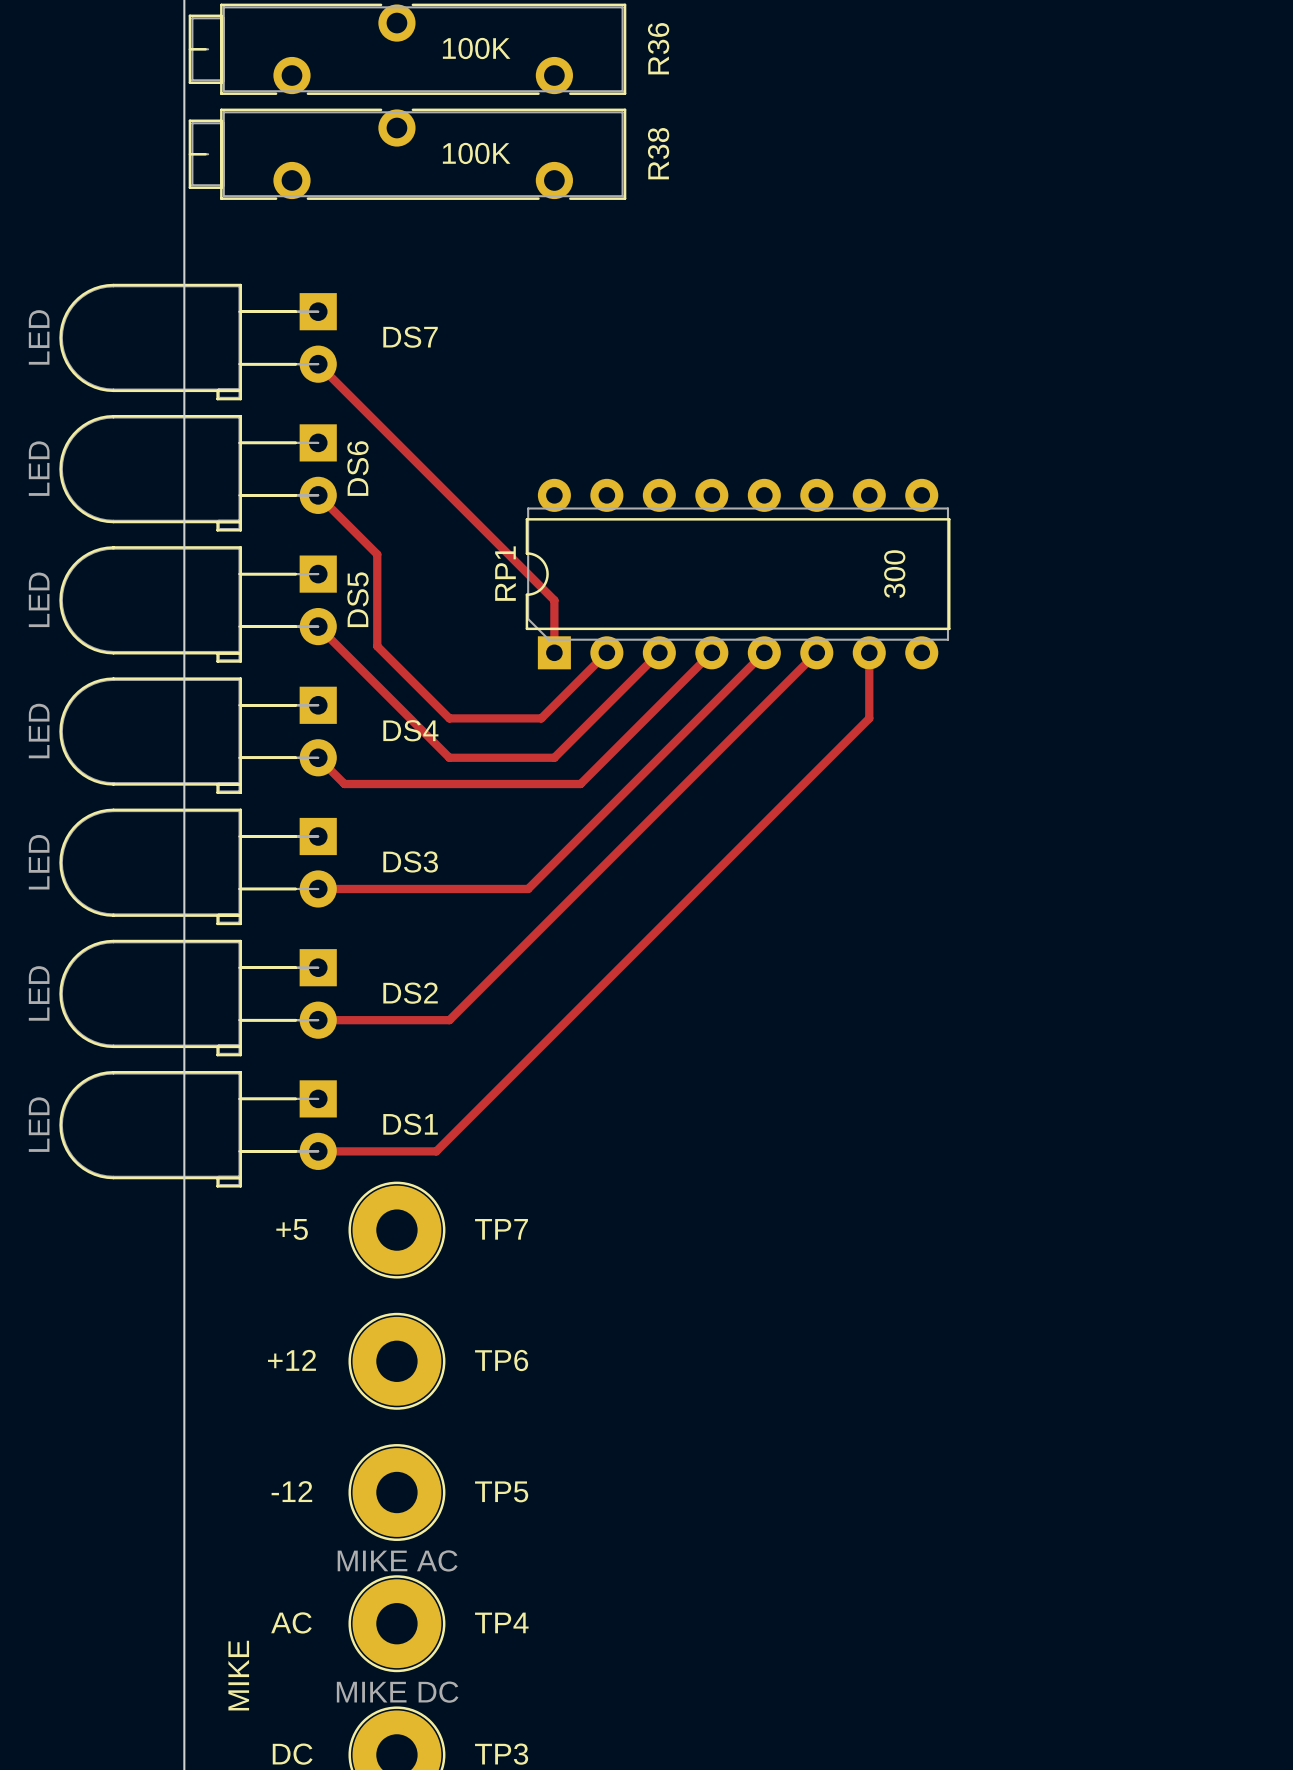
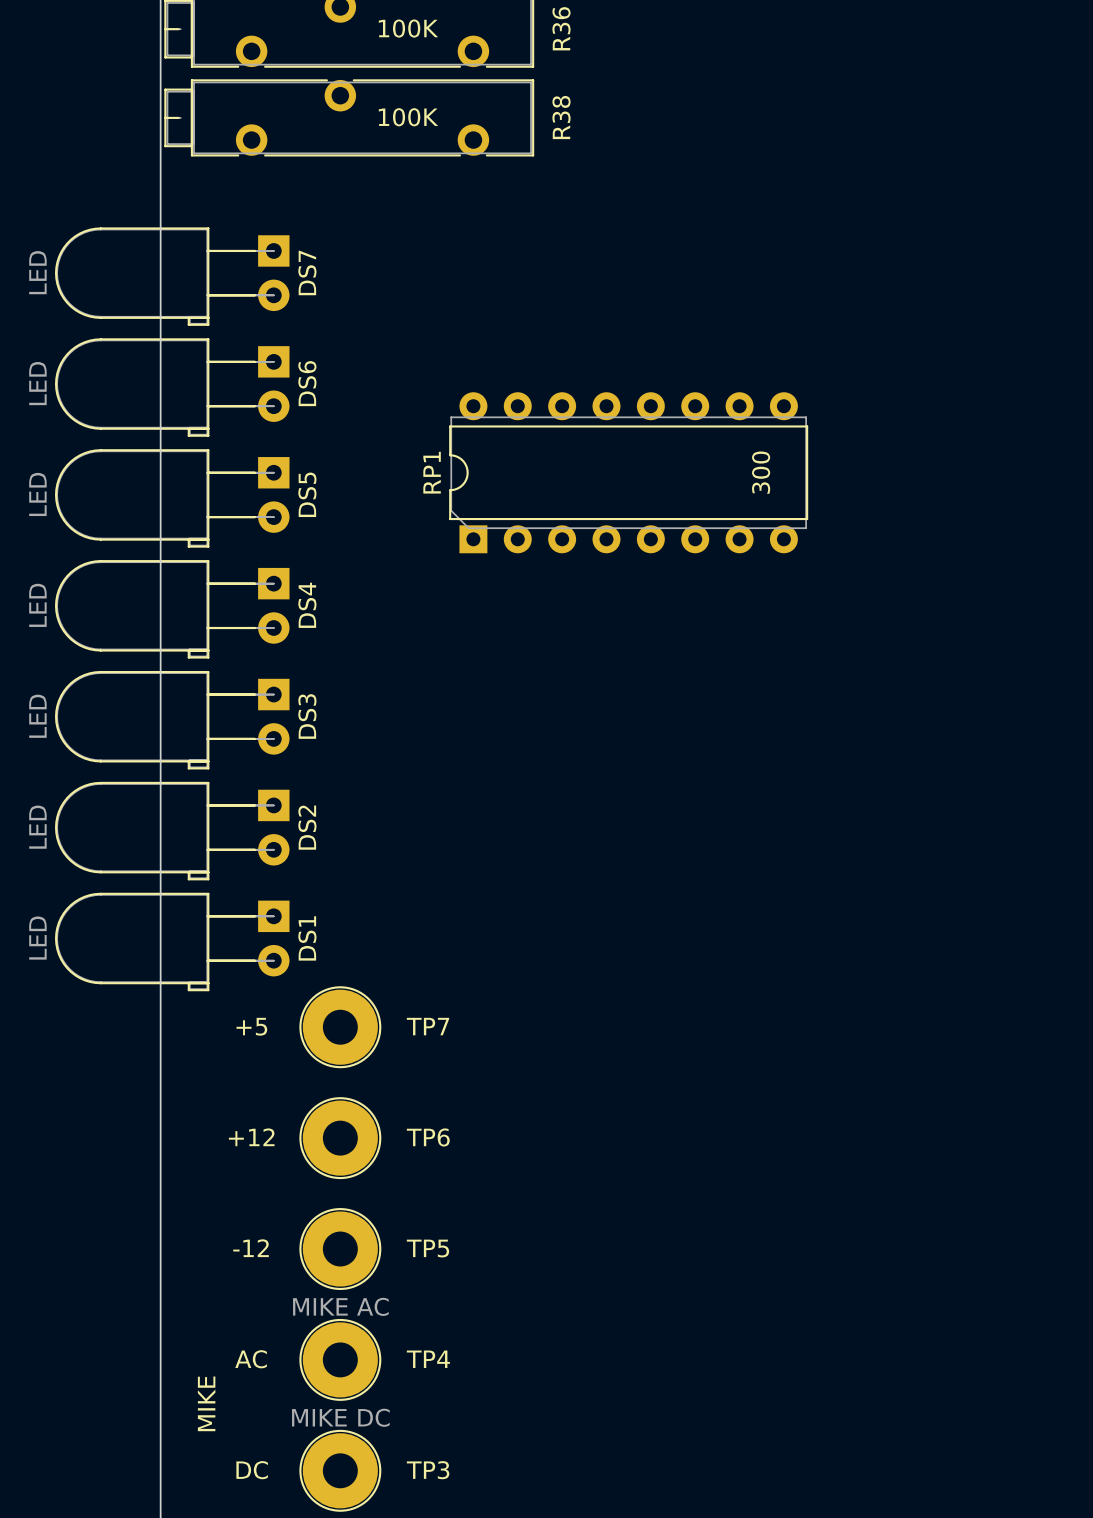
DS7 name rotation: 0° (410, 337) -> 90° counterclockwise (307, 272)
track: (318, 364) (554, 600) (554, 652) -> none
track: (318, 495) (377, 554) (377, 646) (449, 718) (541, 718) (606, 652) -> none
track: (318, 626) (449, 757) (554, 757) (659, 652) -> none
track: (711, 652) (580, 784) (344, 784) (318, 757) -> none
track: (764, 652) (528, 888) (318, 888) -> none
track: (816, 652) (449, 1020) (318, 1020) -> none
track: (869, 652) (869, 718) (436, 1151) (318, 1151) -> none
DS4 name rotation: 0° (410, 730) -> 90° counterclockwise (307, 605)
DS3 name rotation: 0° (410, 861) -> 90° counterclockwise (307, 716)
DS2 name rotation: 0° (410, 993) -> 90° counterclockwise (307, 827)
DS1 name rotation: 0° (410, 1124) -> 90° counterclockwise (307, 938)

